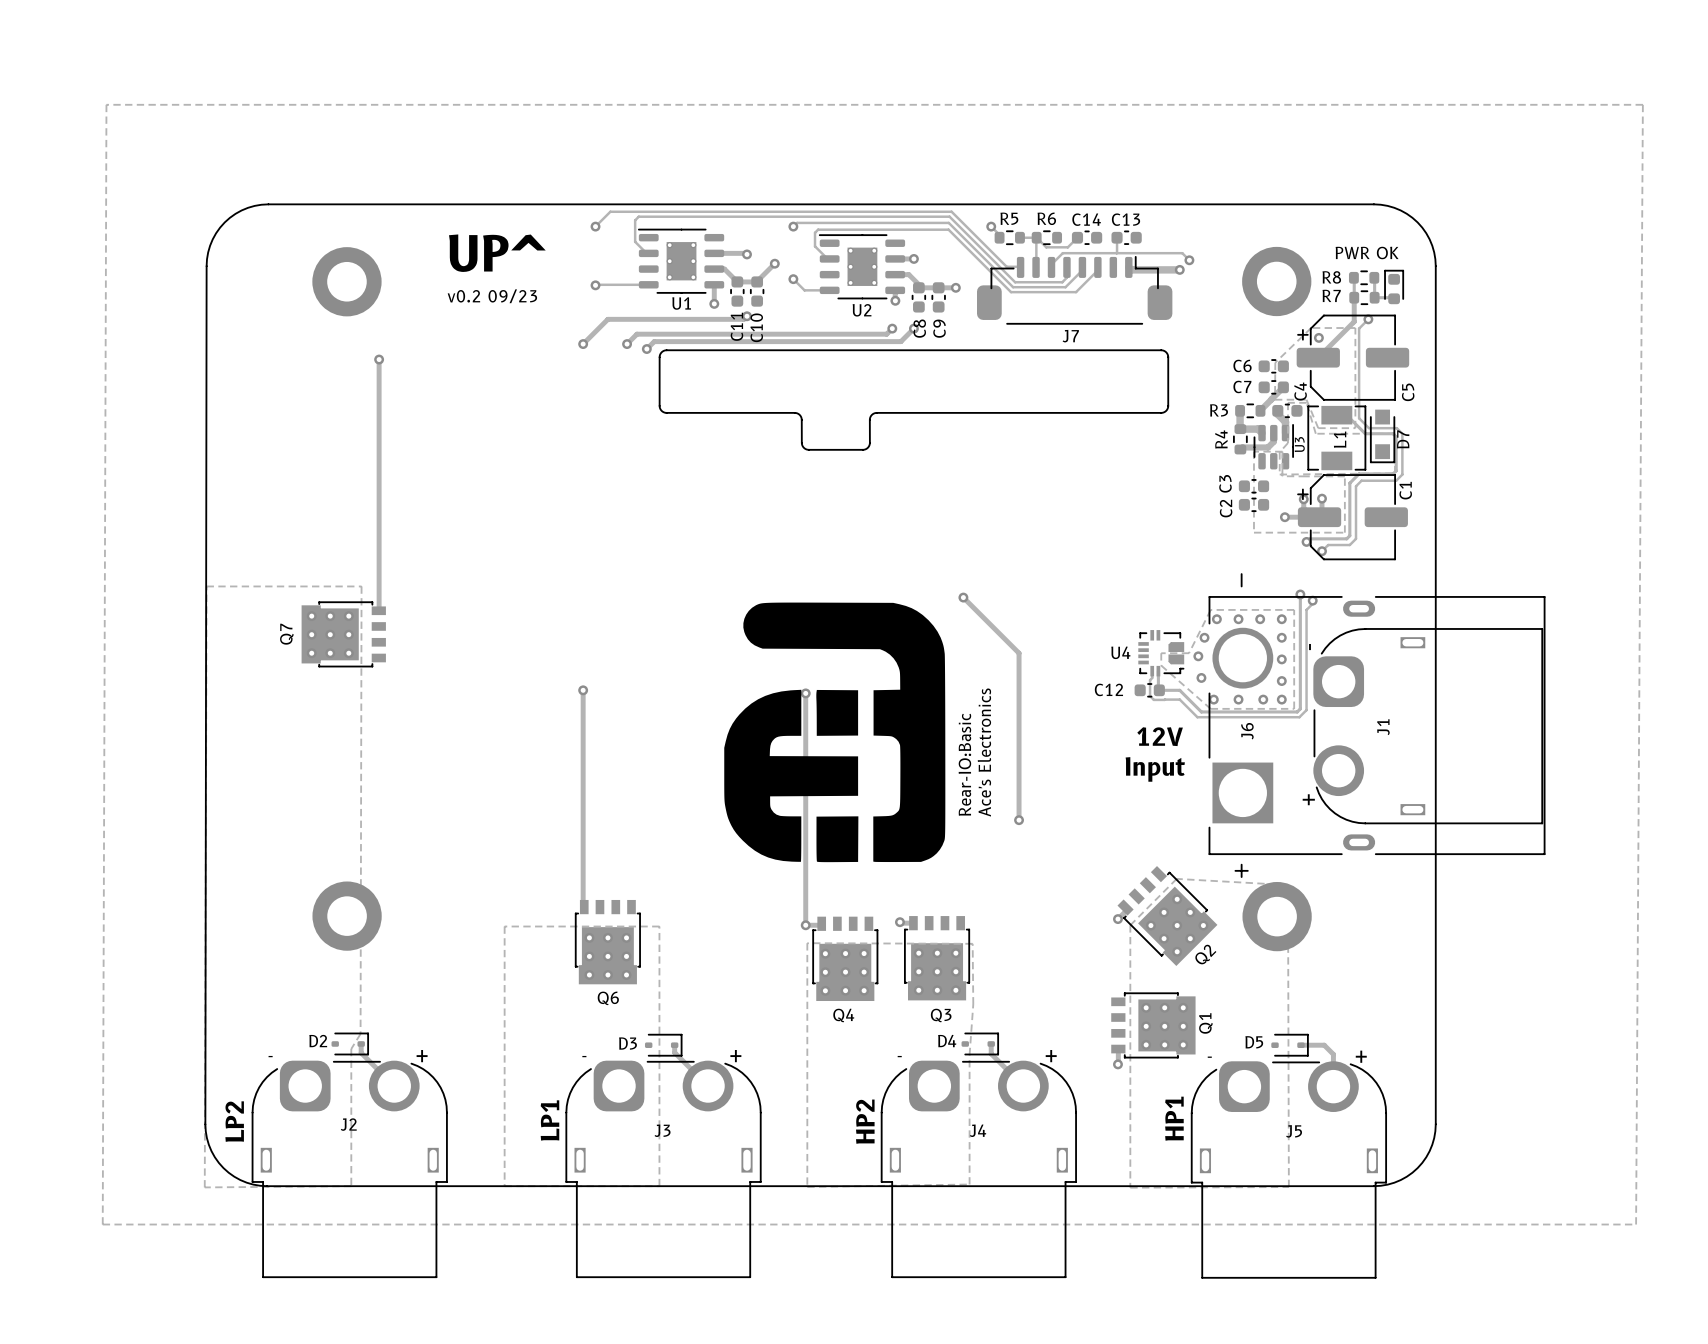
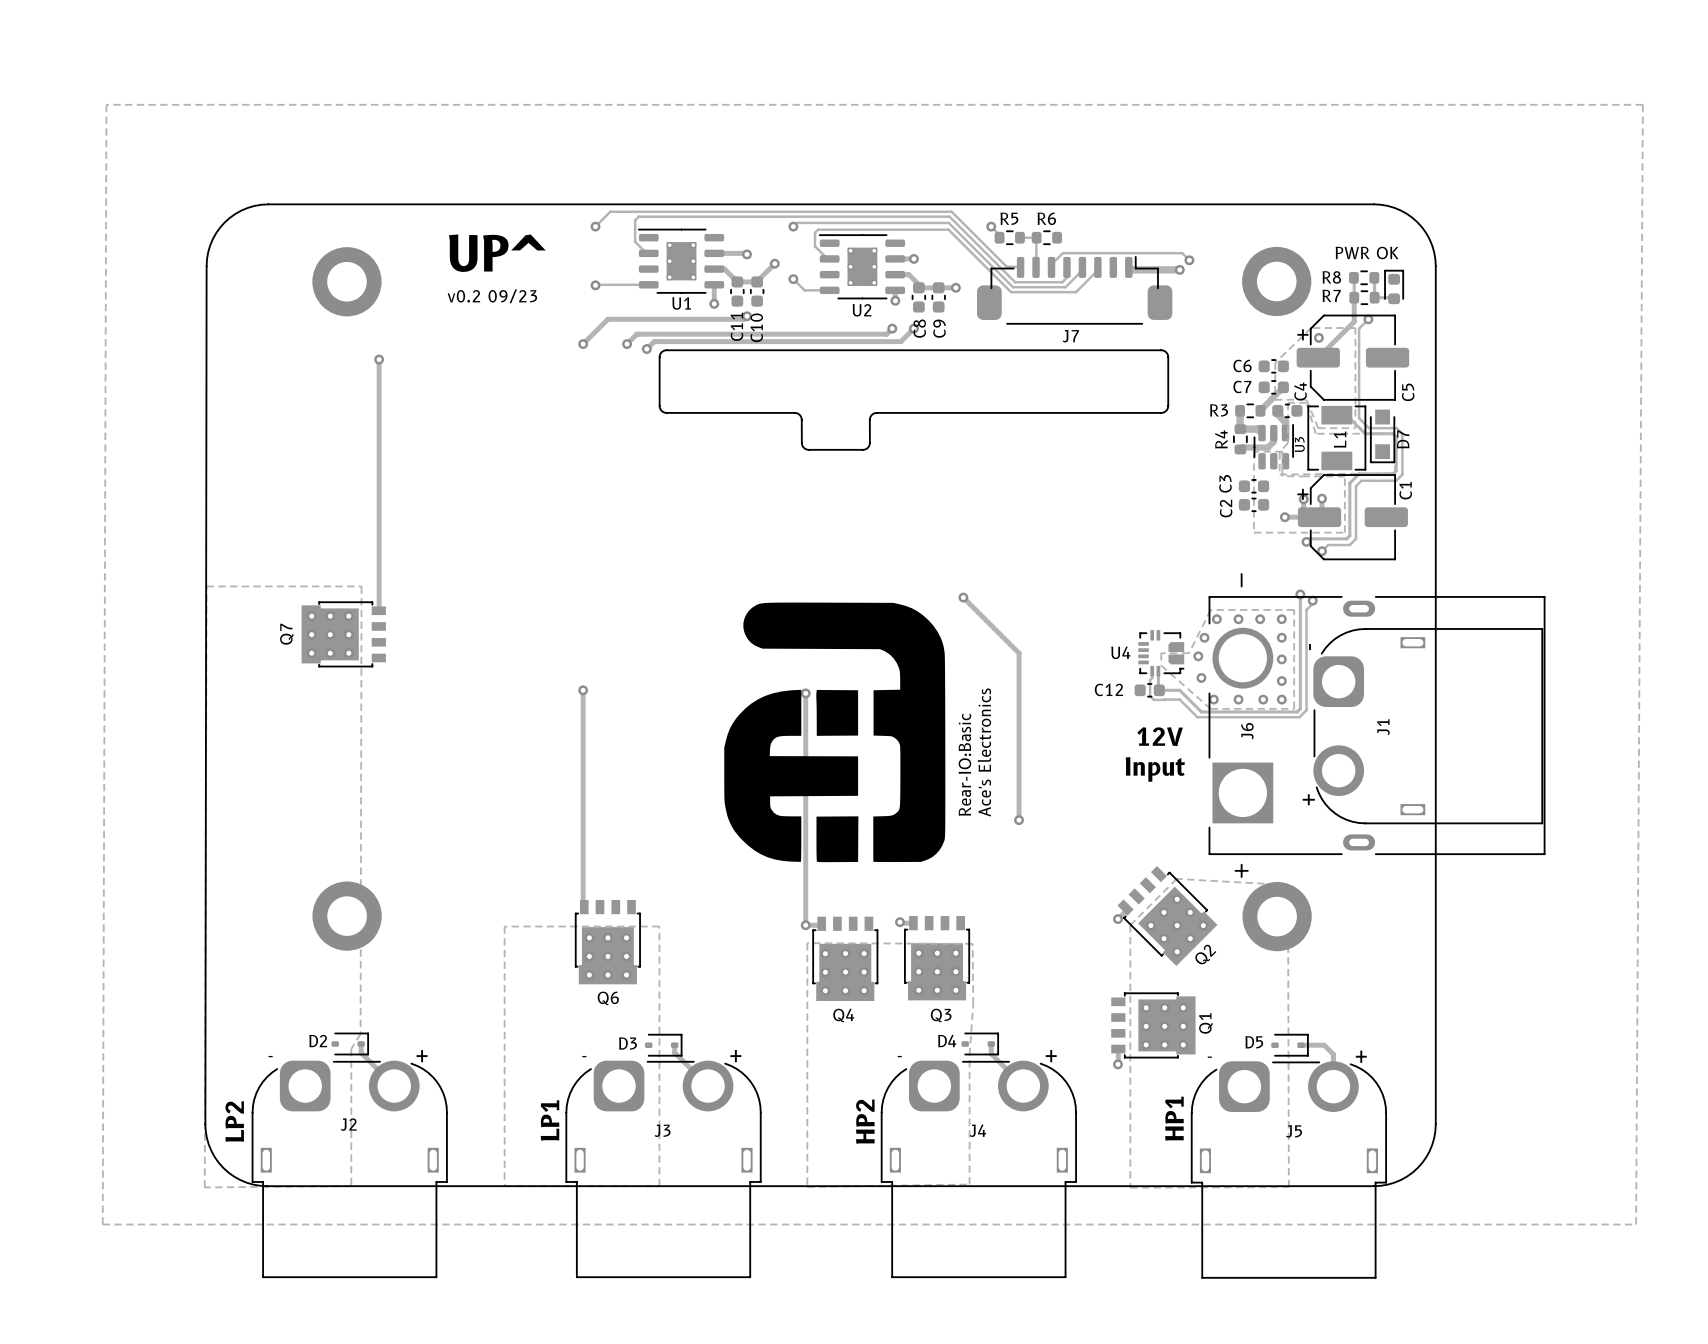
track: (1036, 237) (1046, 247) (1067, 247) (1077, 237) -> none
C14: (1087, 237) -> none
track: (1117, 237) (1116, 253) -> none
C13: (1126, 237) -> none

